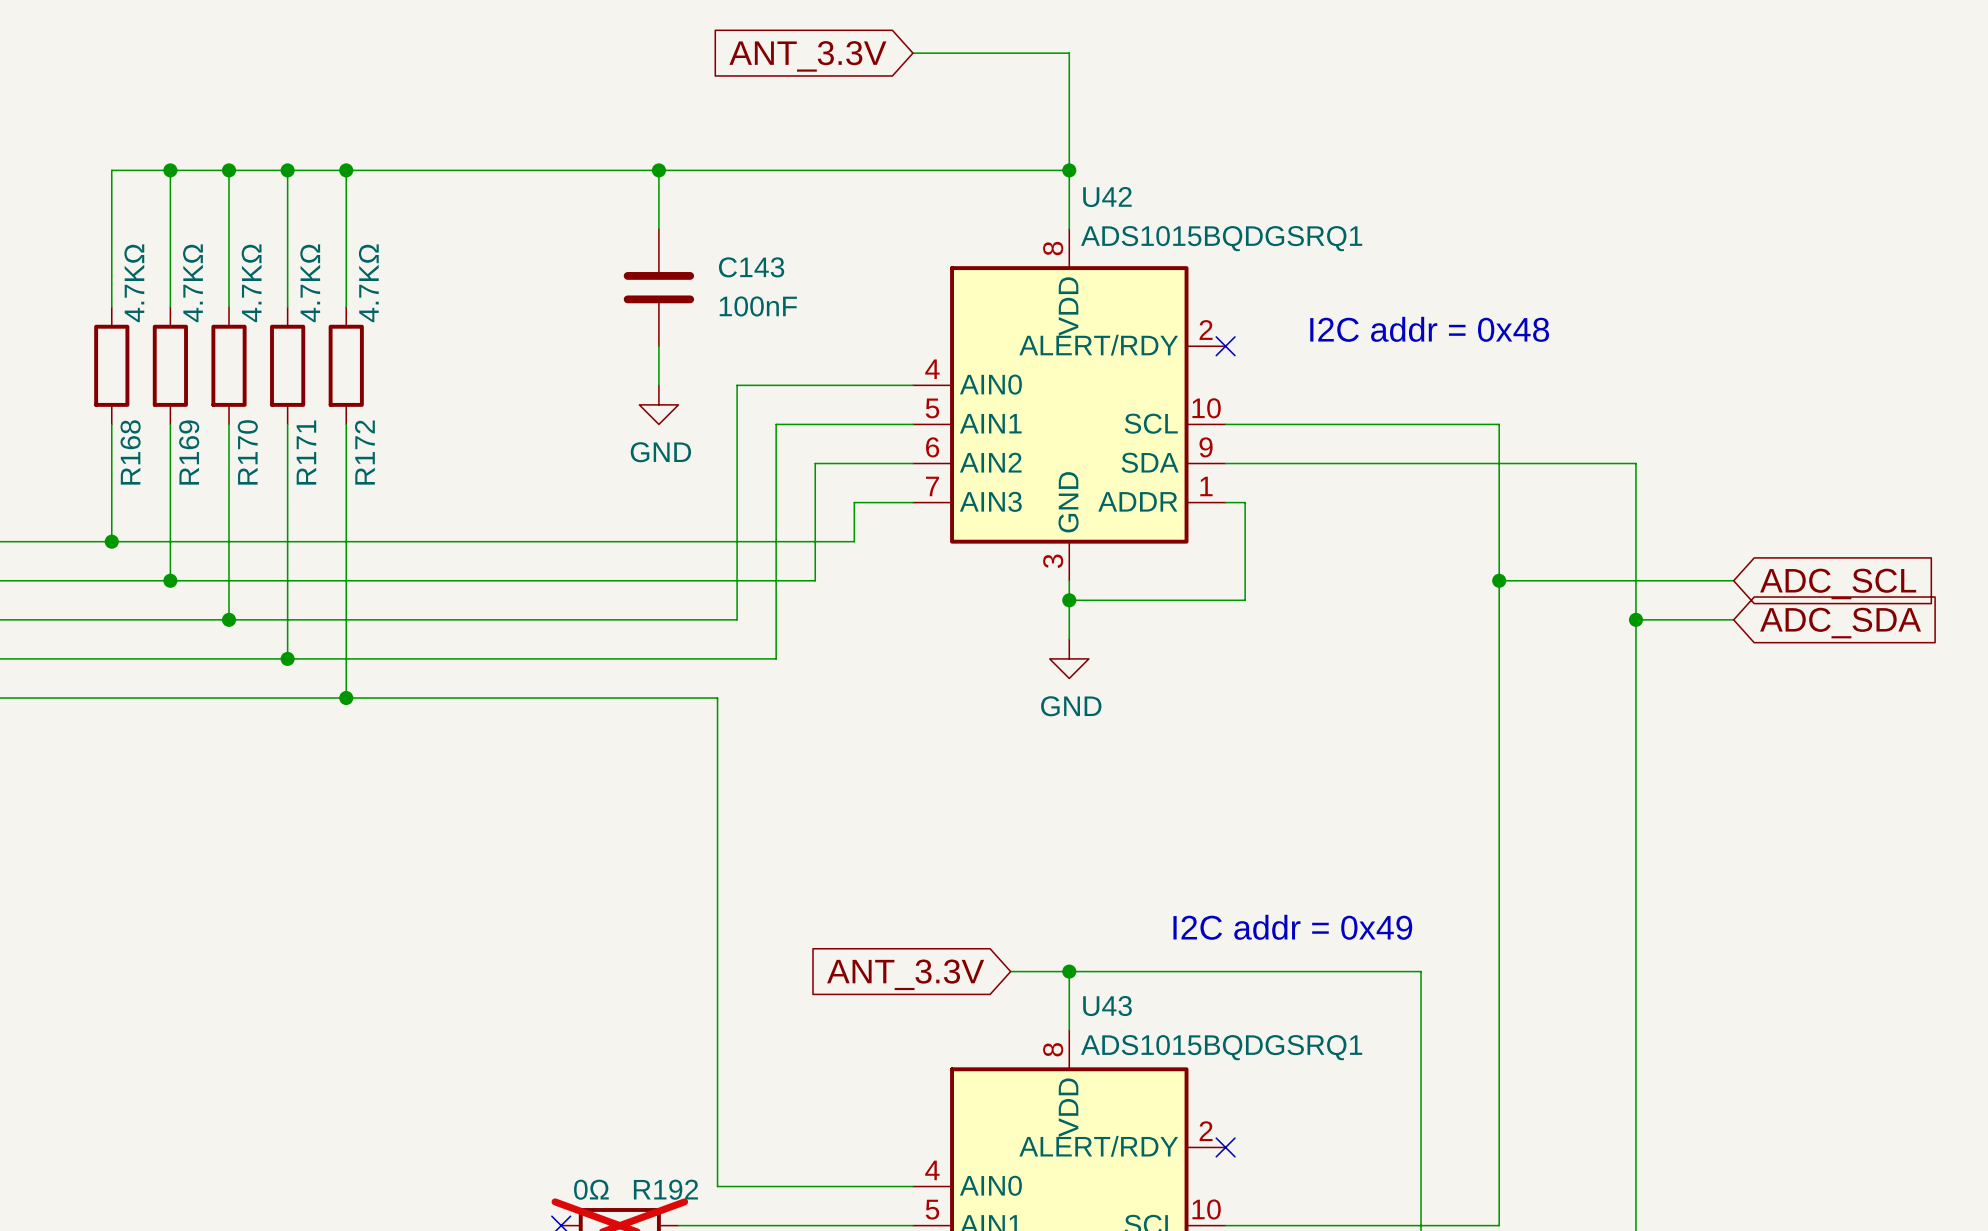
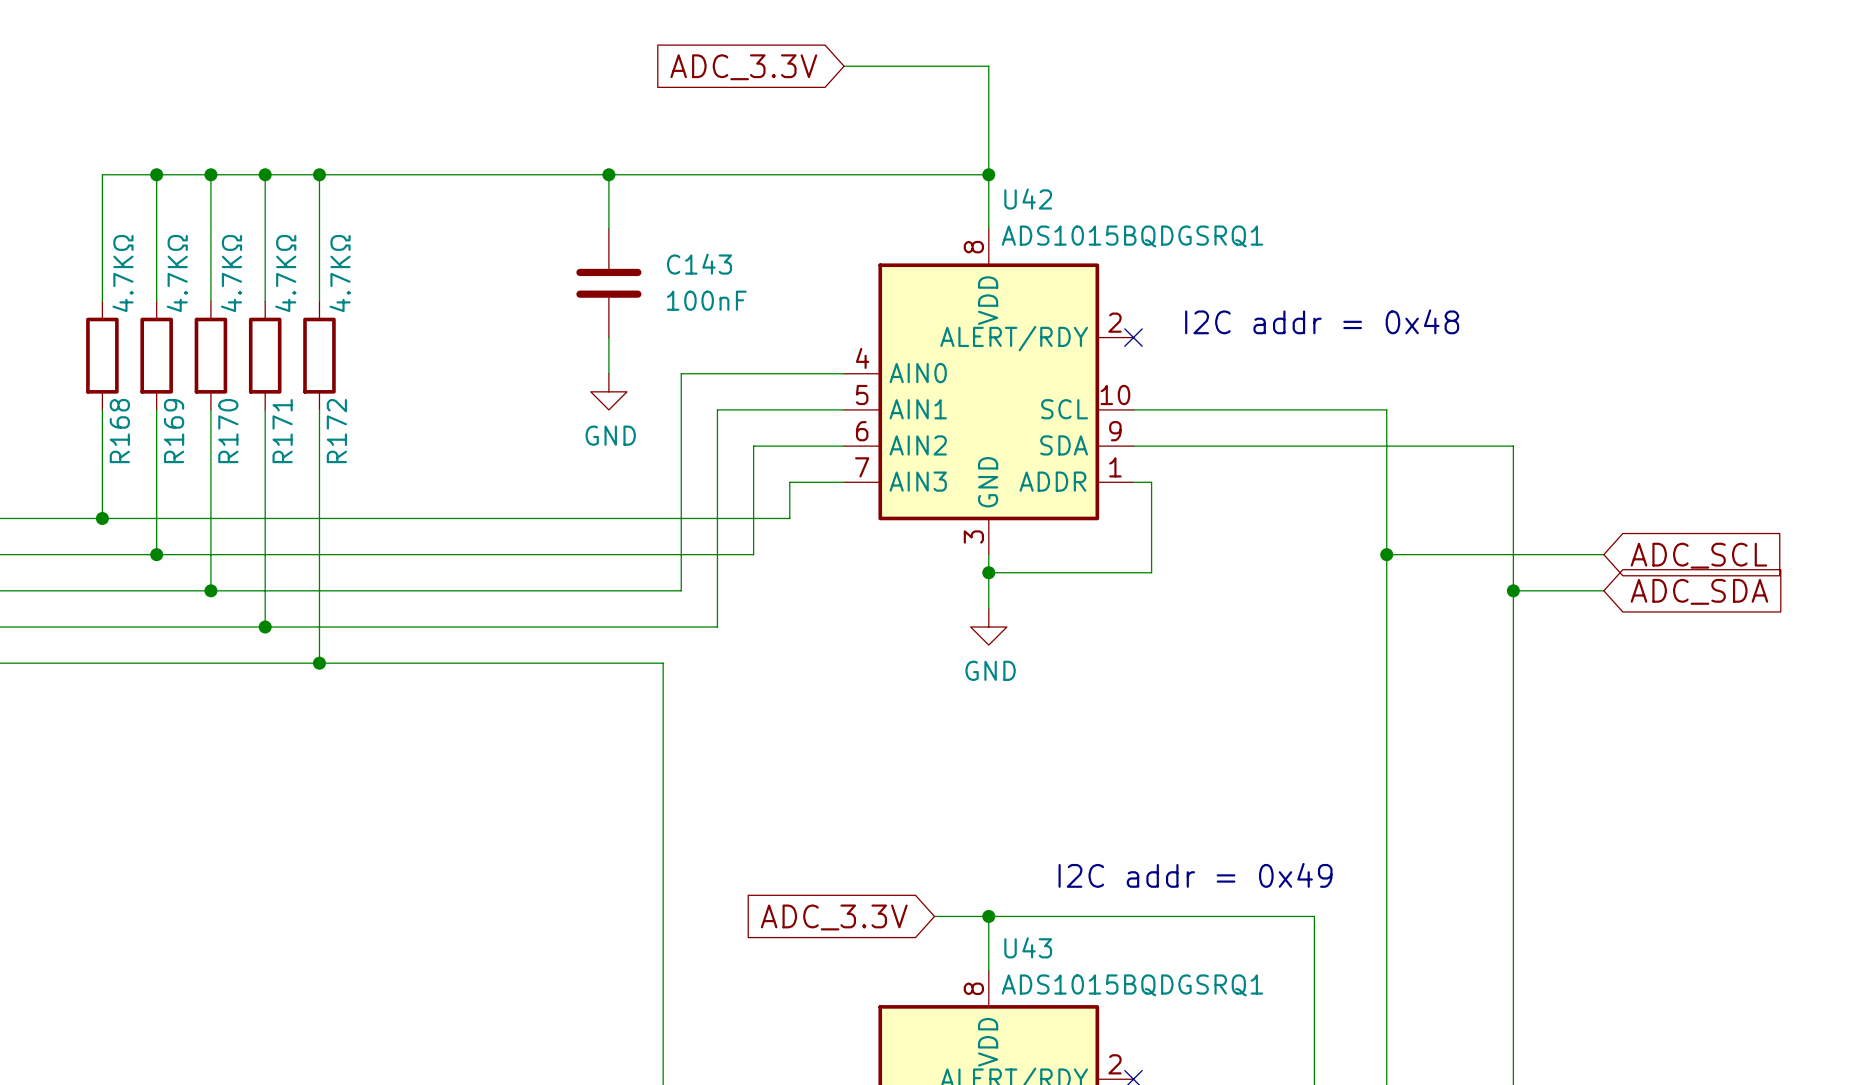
global label: ANT_3.3V (807, 56) -> ADC_3.3V (743, 67)
global label: ANT_3.3V (905, 974) -> ADC_3.3V (834, 917)

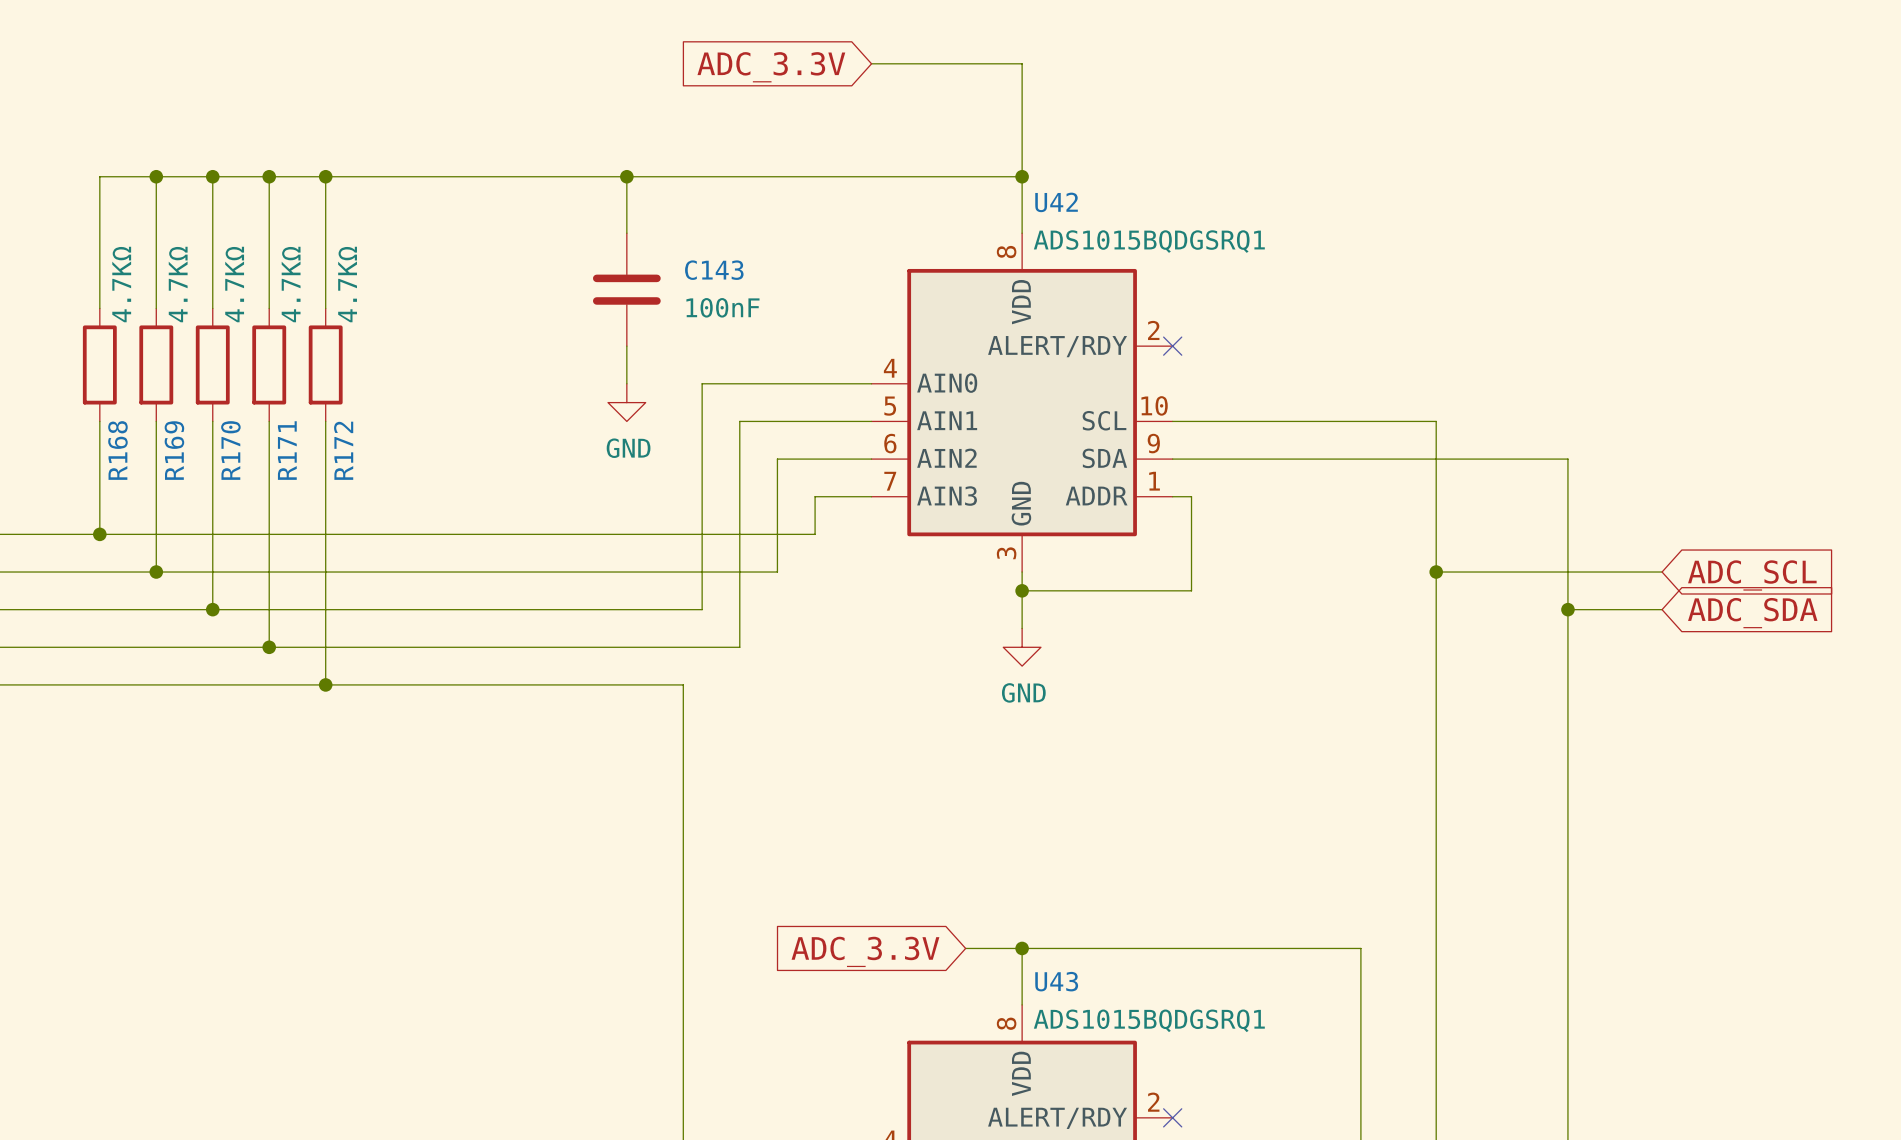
text: I2C addr = 0x48 (1322, 321) -> none
text: I2C addr = 0x49 (1195, 875) -> none

